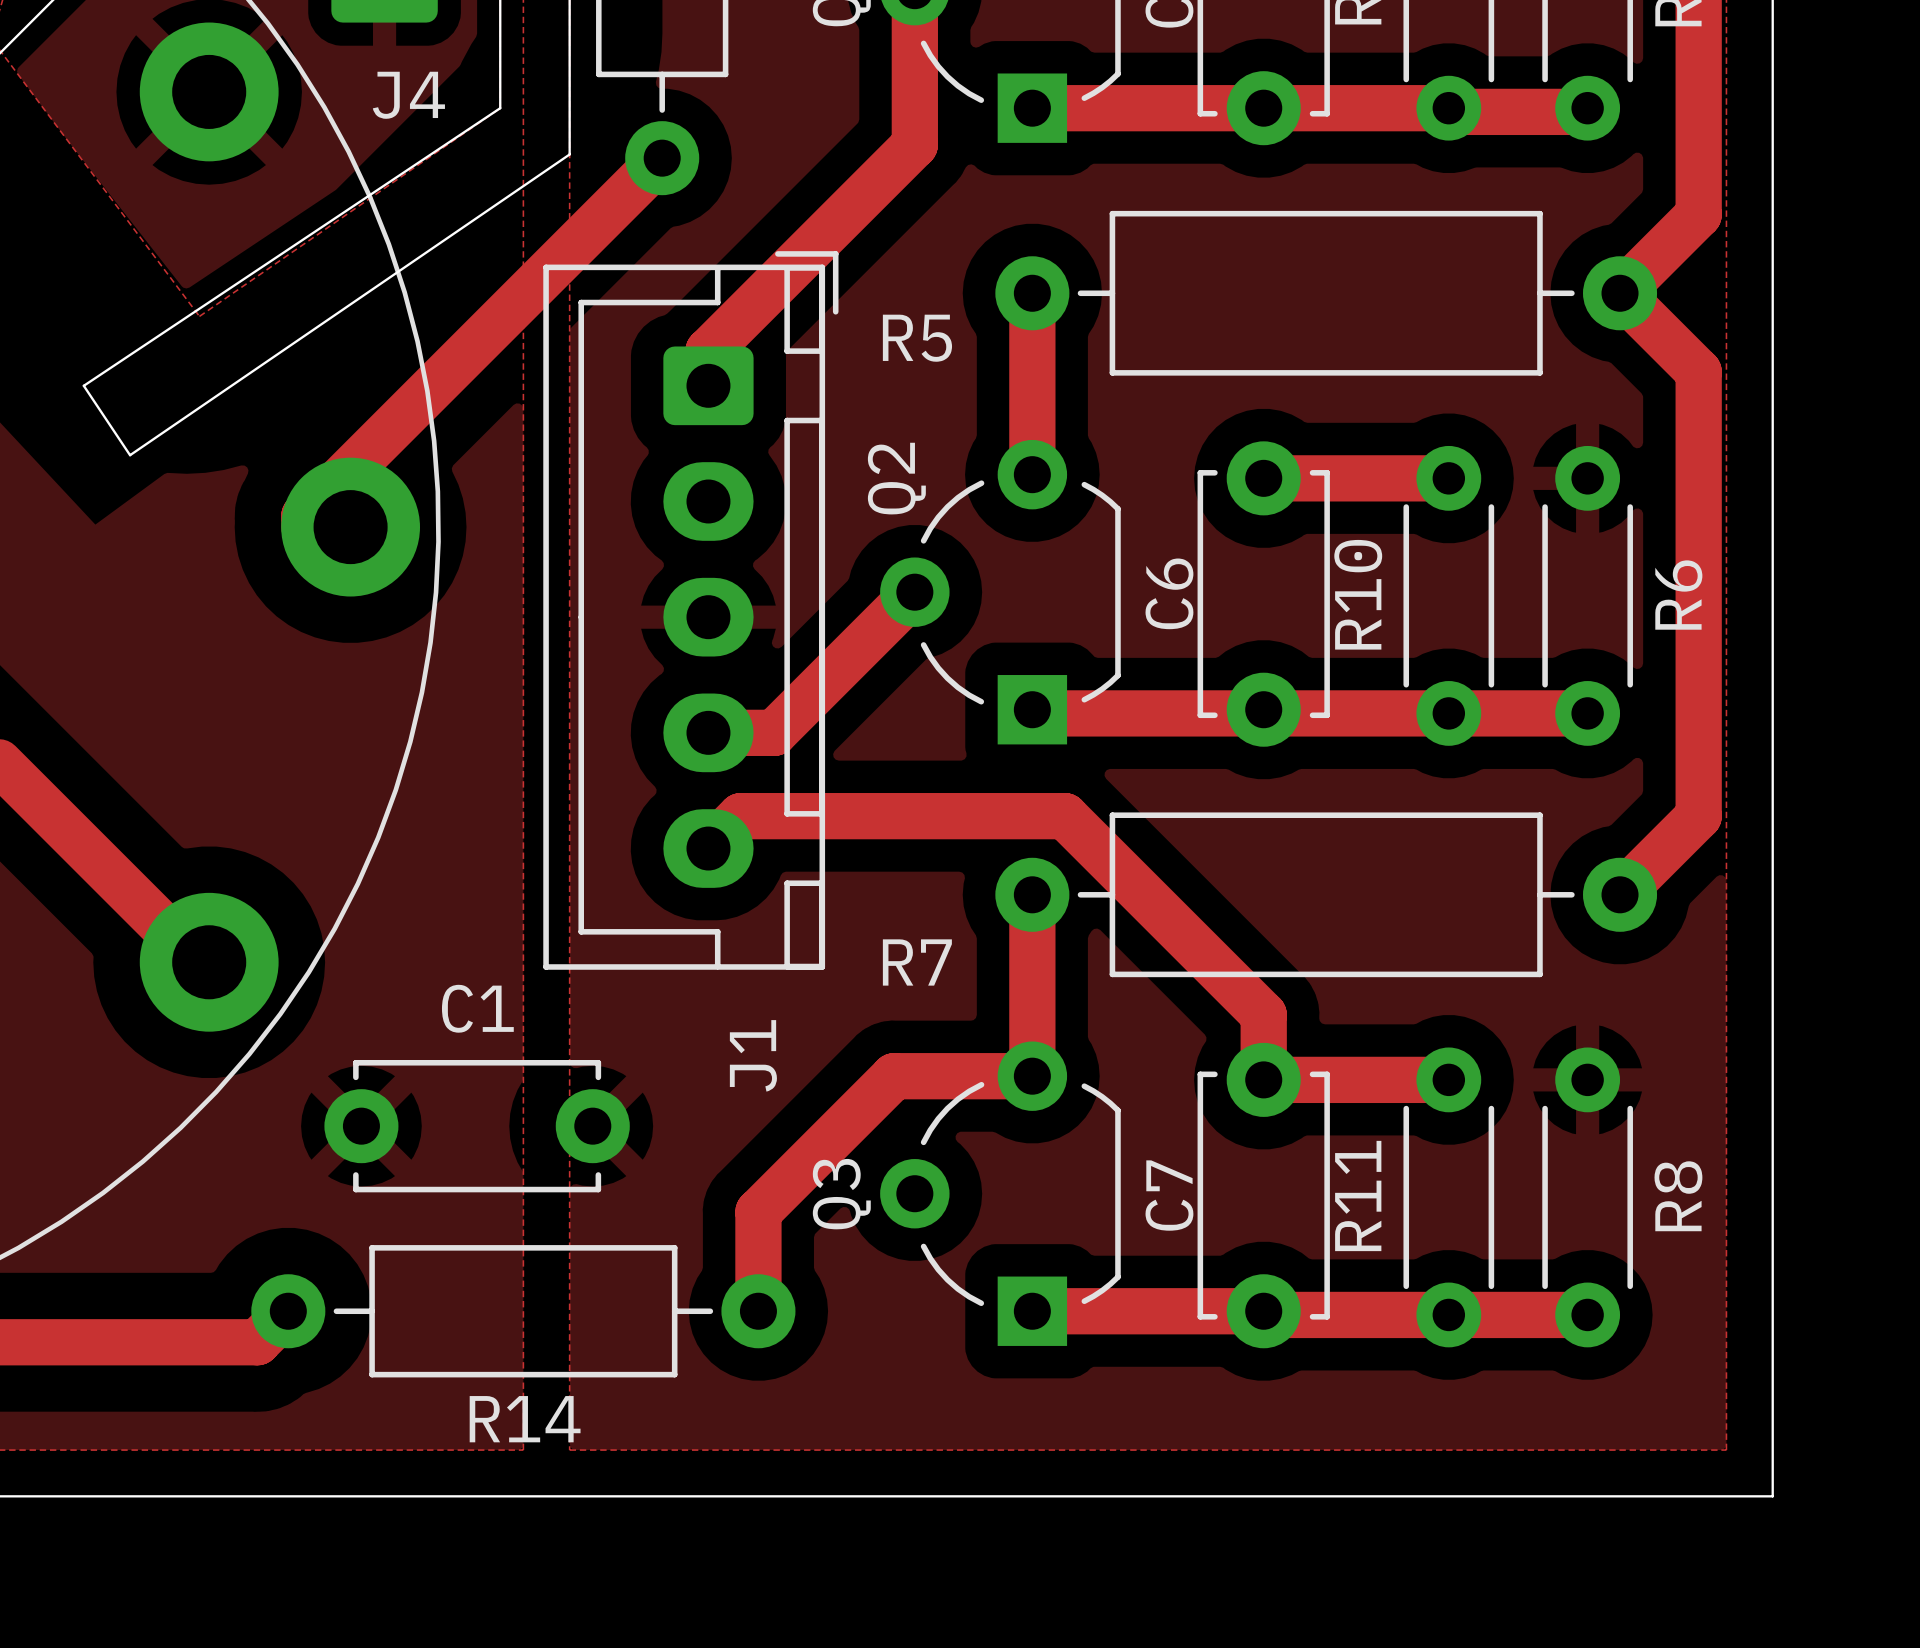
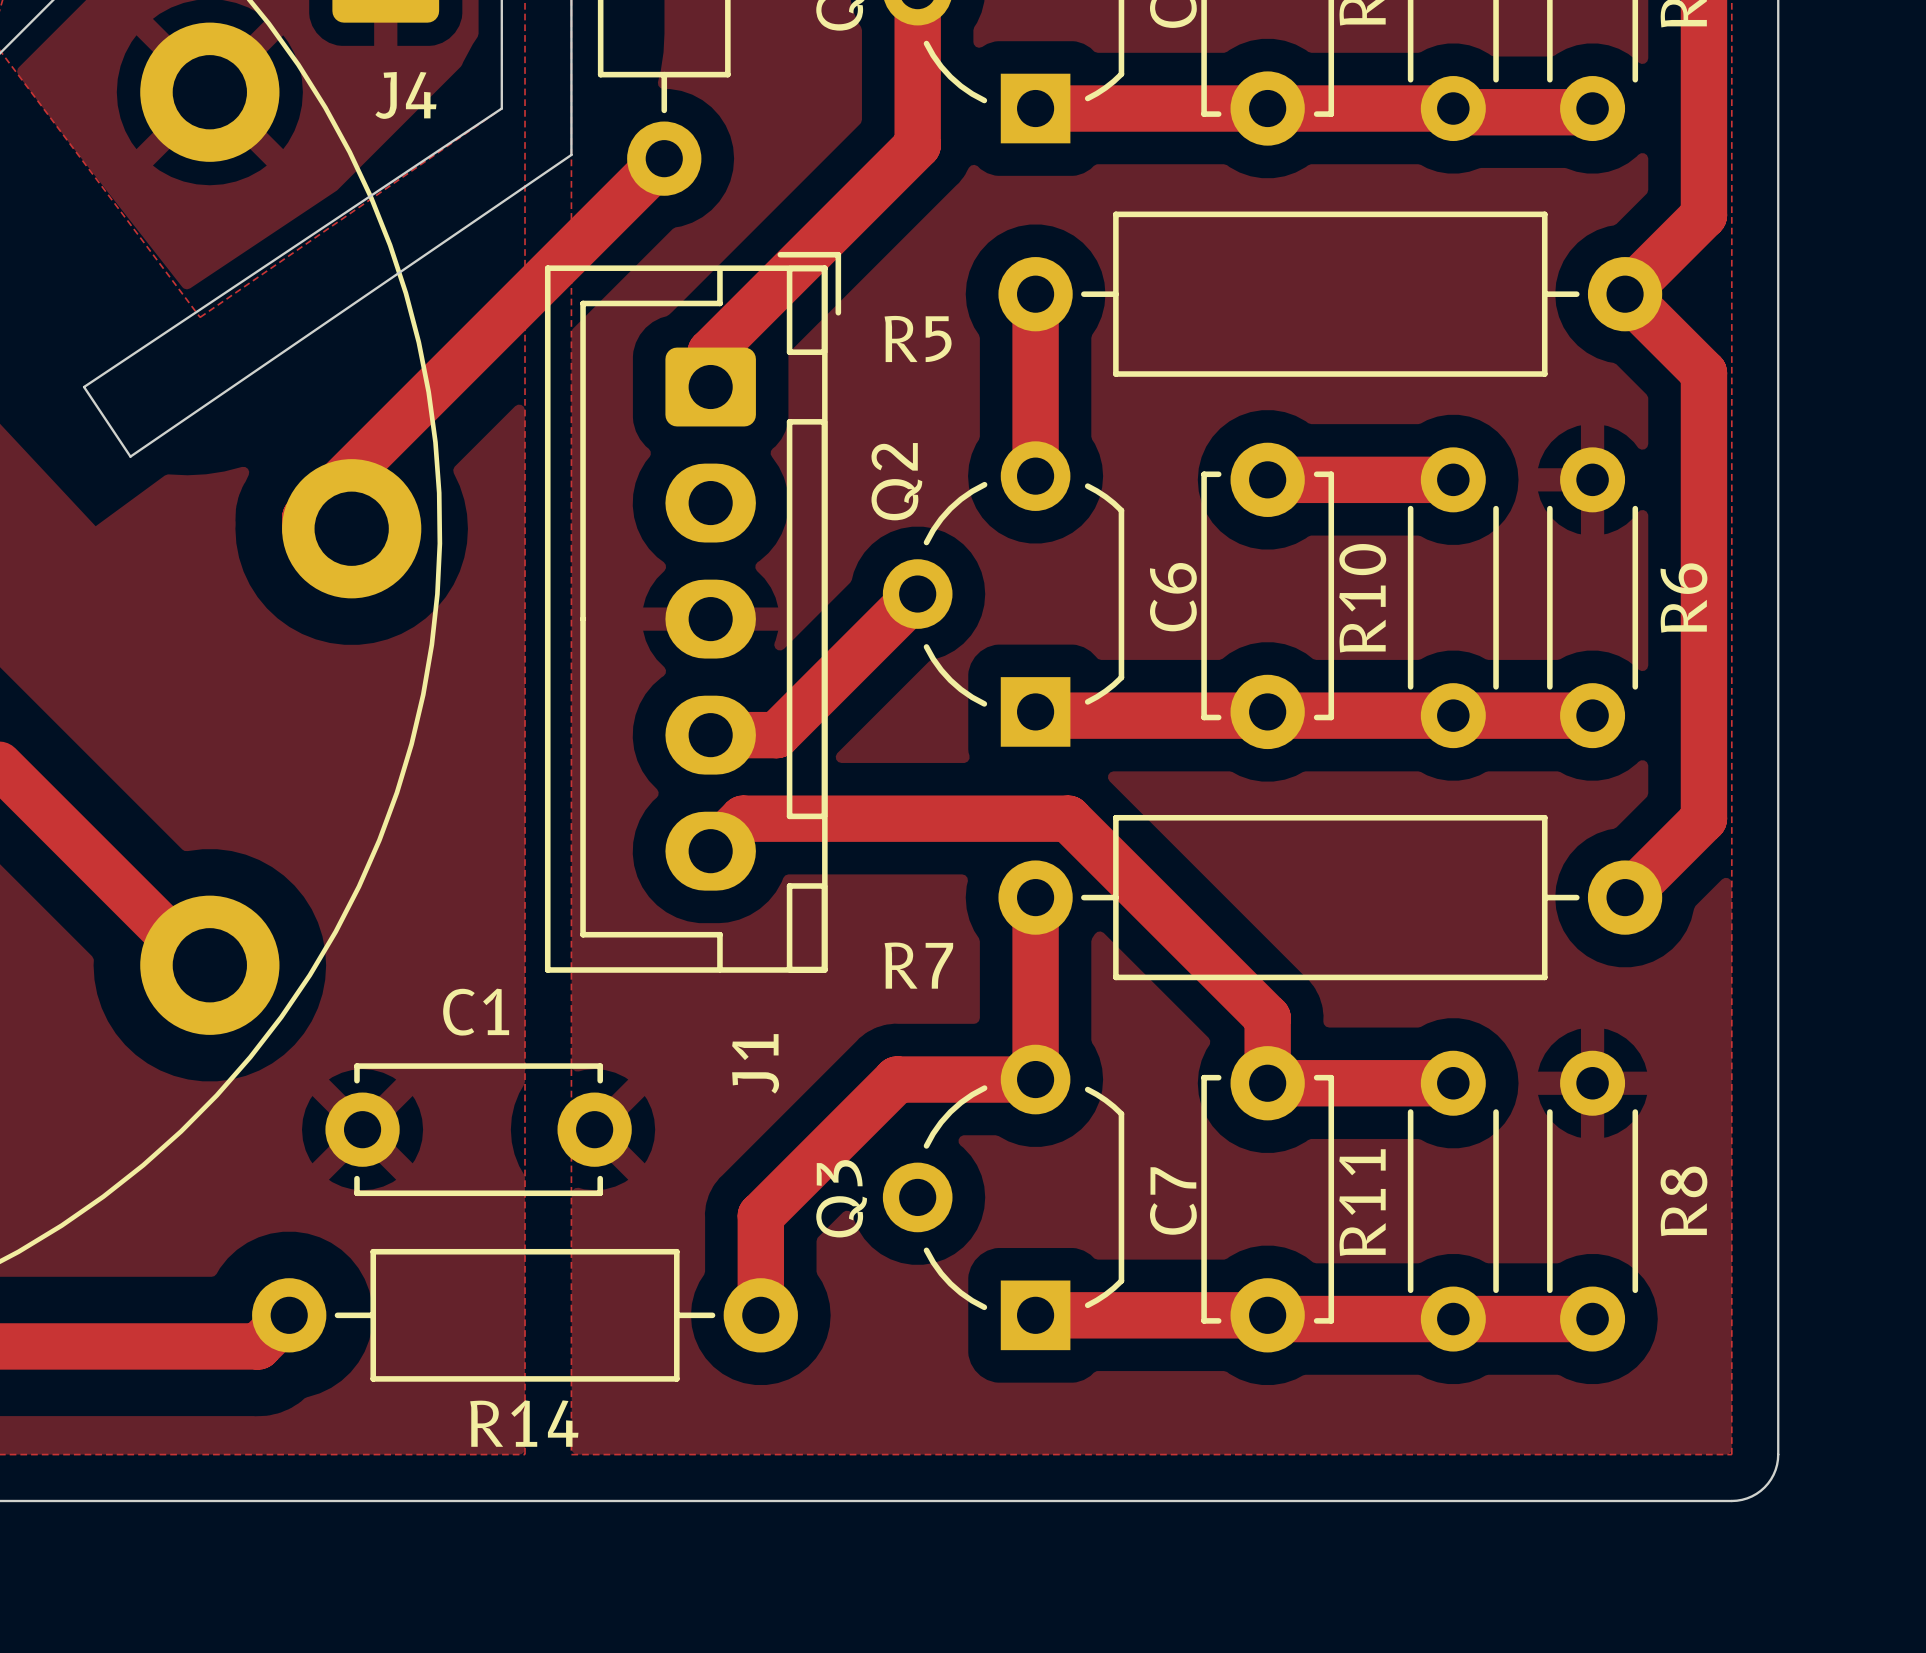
board edge: (1772, 1450) (1772, 1496) (1726, 1496) -> (1778, 1454) (1775, 1469) (1764, 1487) (1751, 1496) (1731, 1500)

